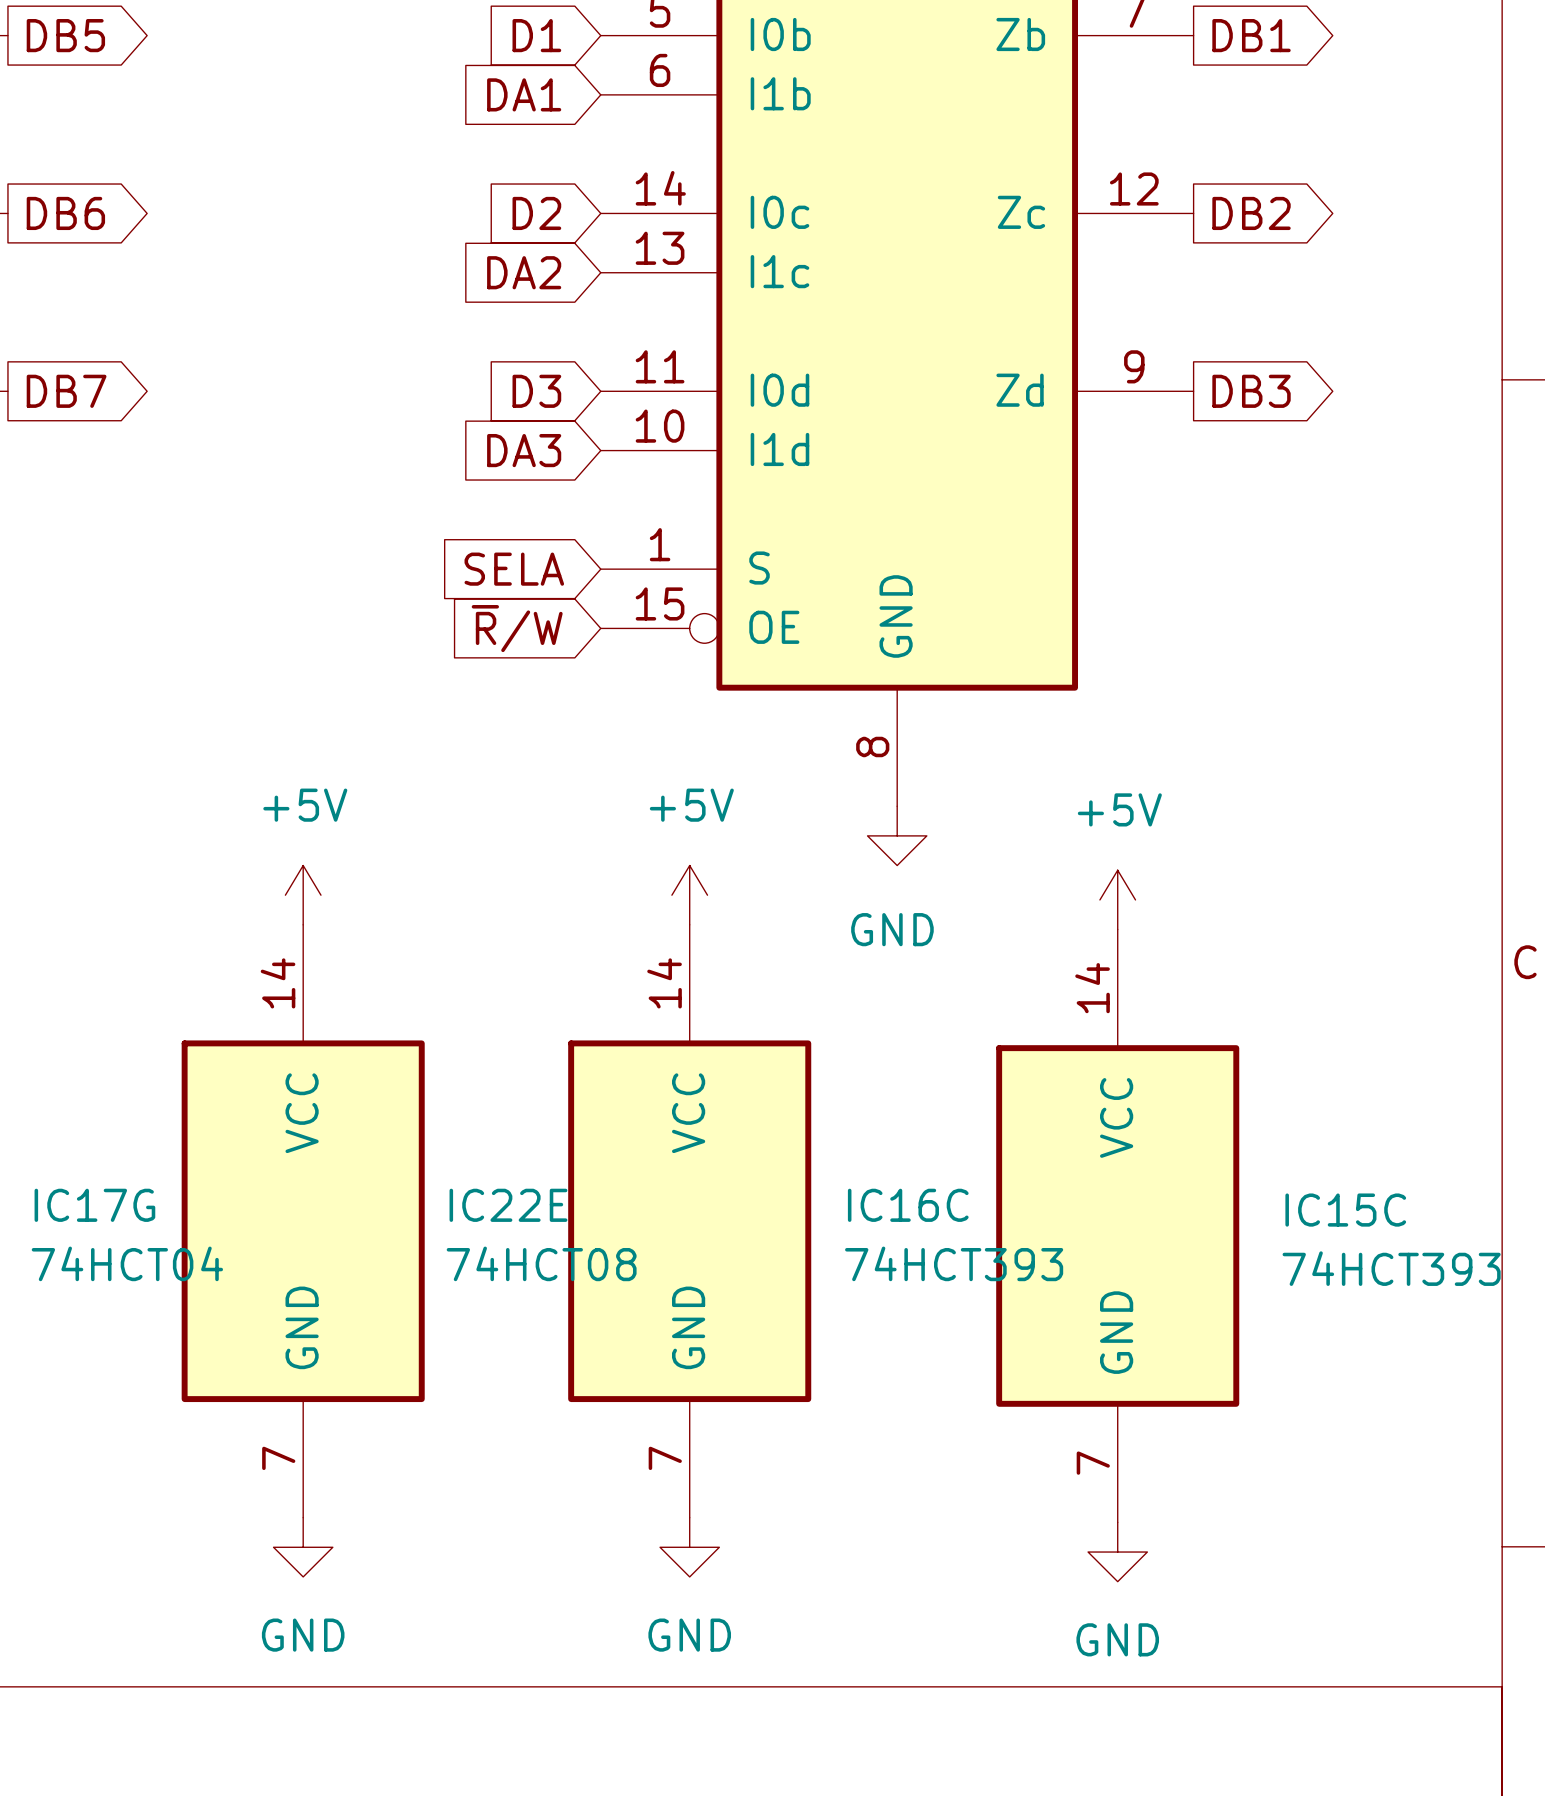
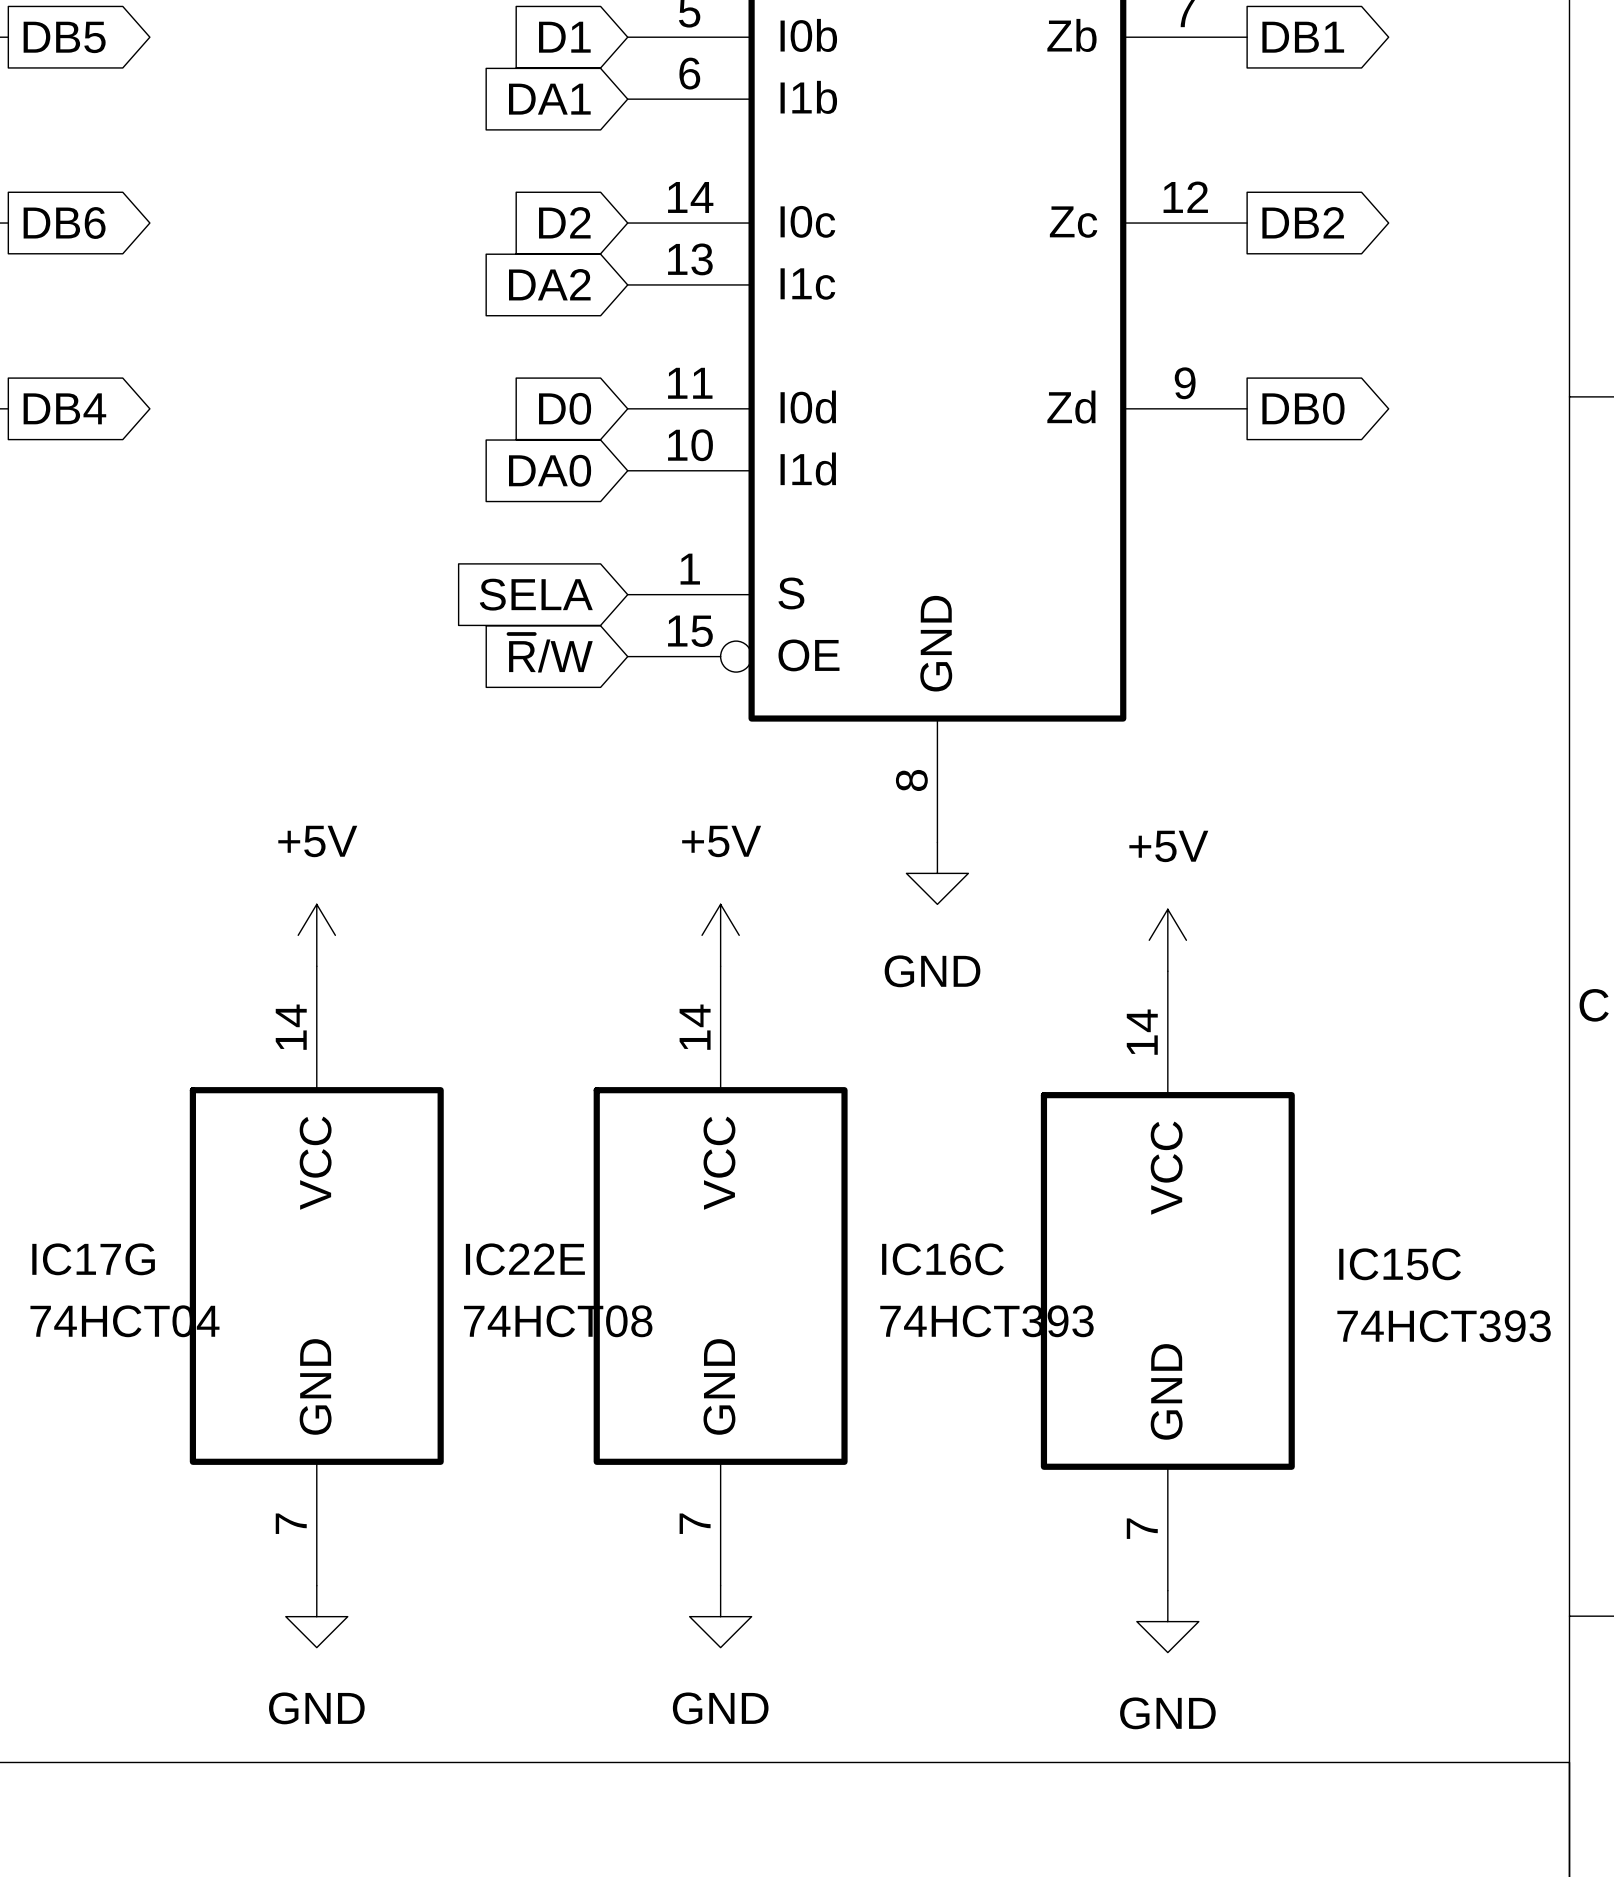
global label: DB7 (66, 391) -> DB4 (64, 408)
global label: D3 (536, 391) -> D0 (565, 408)
global label: DB3 (1251, 391) -> DB0 (1303, 408)
global label: DA3 (524, 450) -> DA0 (550, 470)

